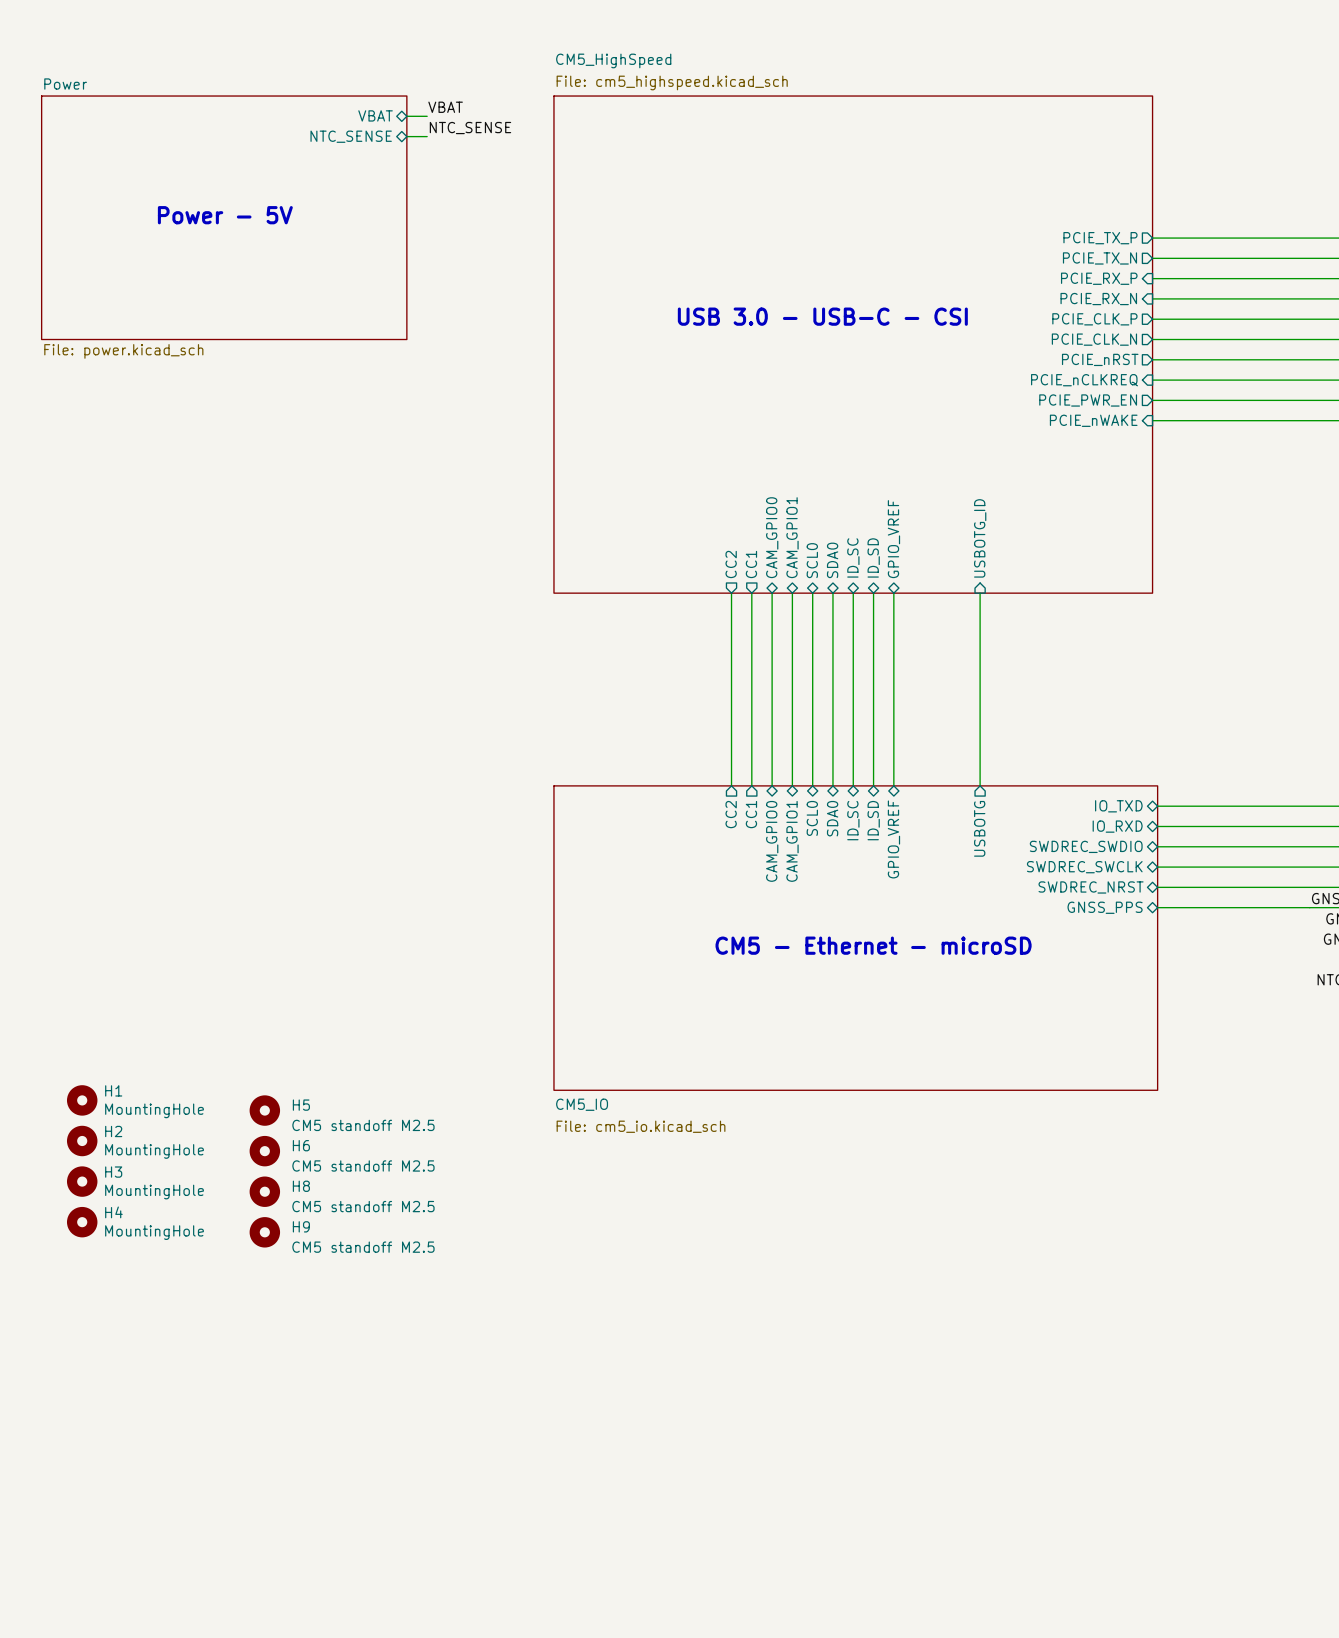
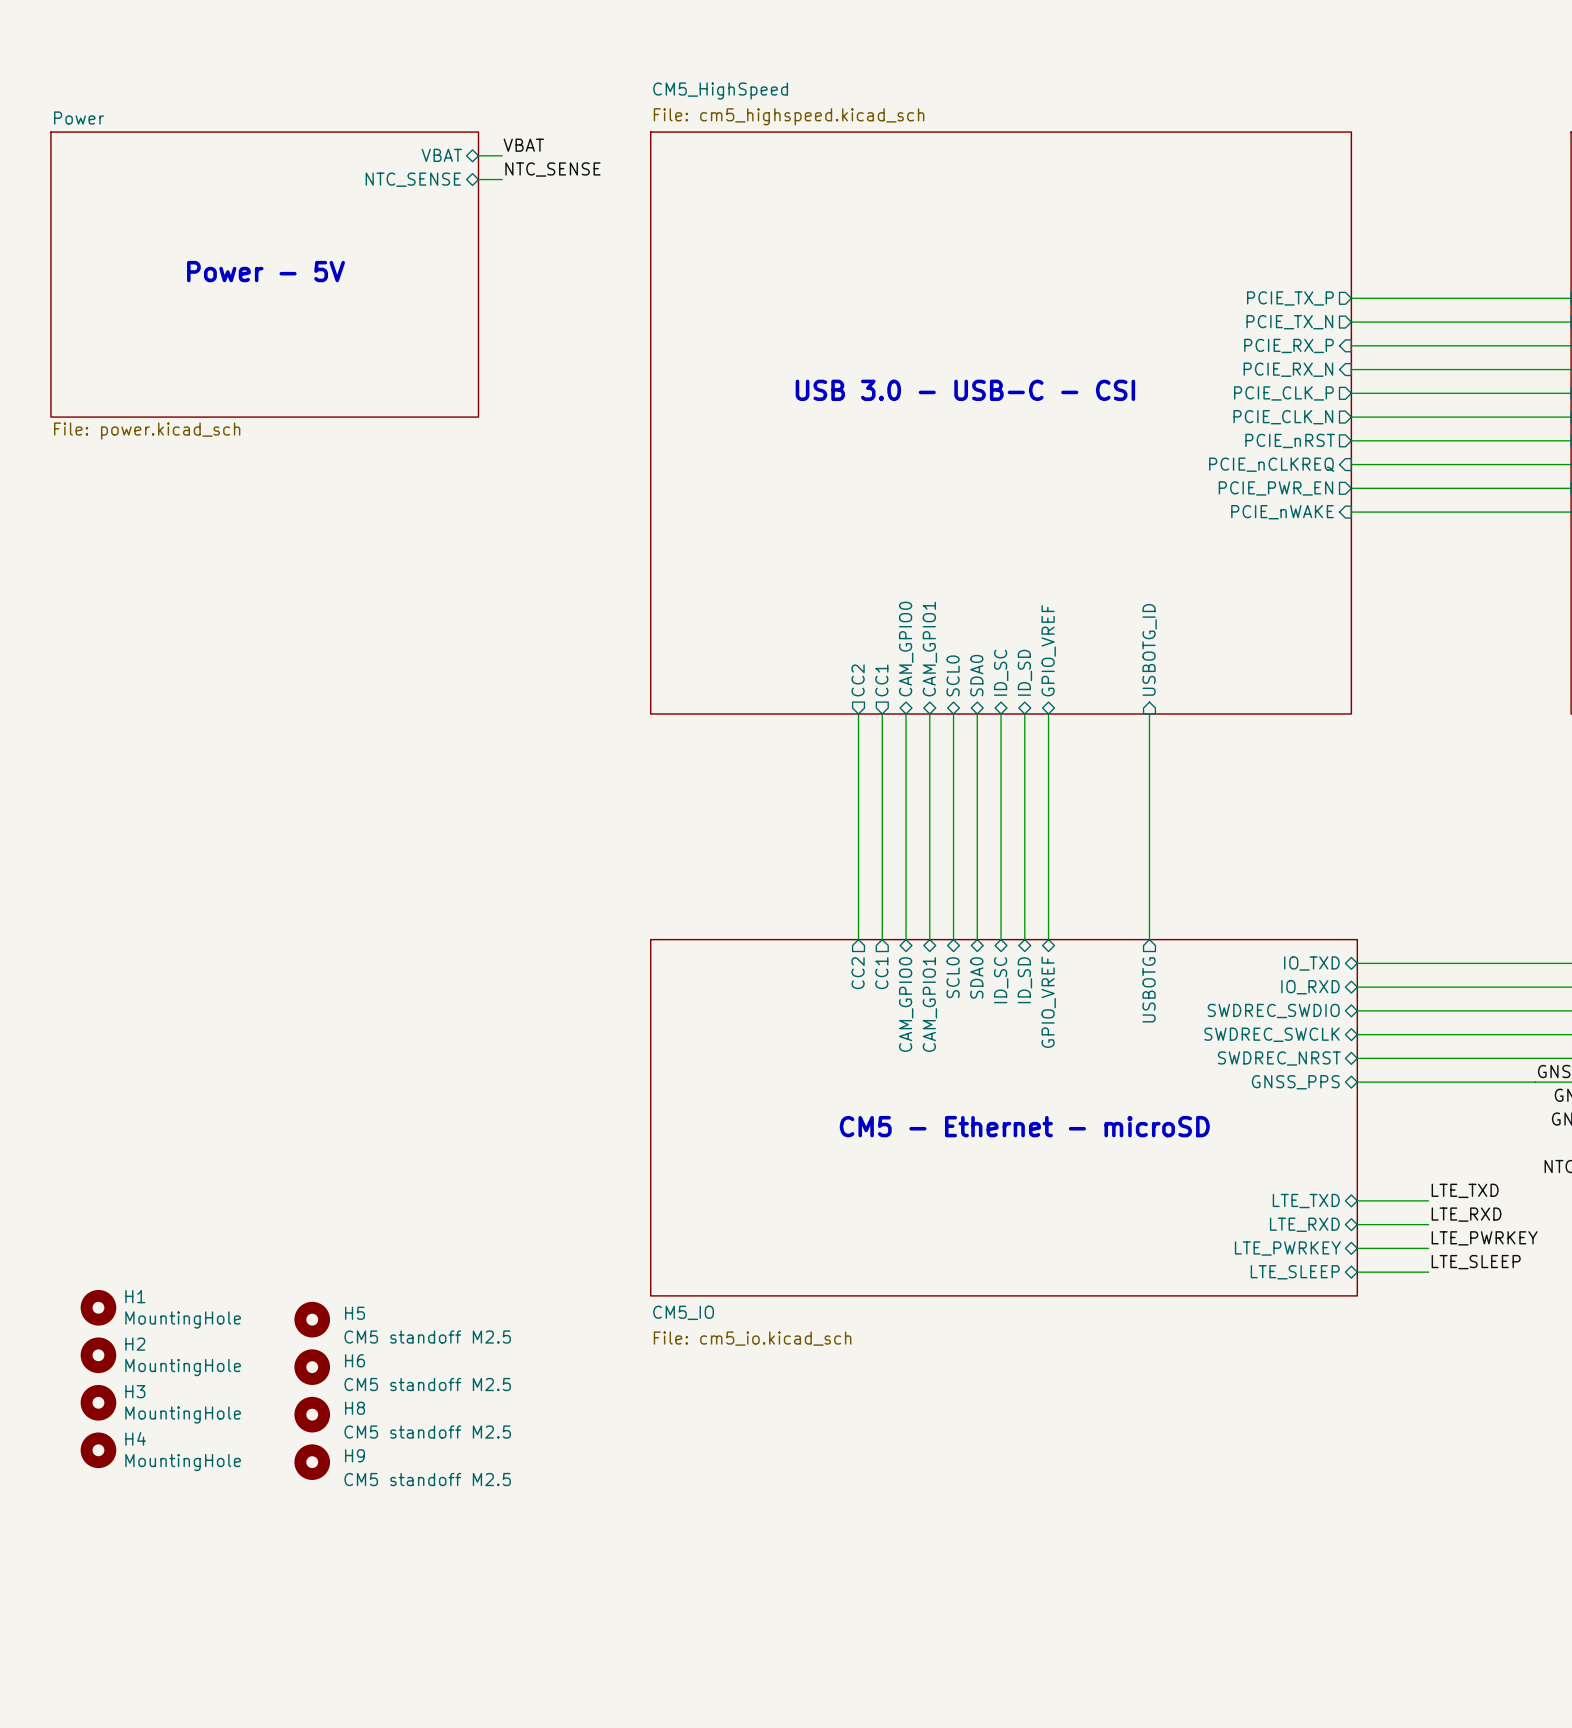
label: none -> LTE_TXD (1465, 1190)
sheet pin: none -> LTE_TXD (1306, 1201)
wire: none -> (1357, 1200) (1428, 1200)
label: none -> LTE_RXD (1466, 1214)
sheet pin: none -> LTE_RXD (1304, 1224)
wire: none -> (1357, 1224) (1428, 1224)
label: none -> LTE_PWRKEY (1484, 1238)
sheet pin: none -> LTE_PWRKEY (1287, 1248)
wire: none -> (1357, 1248) (1428, 1248)
label: none -> LTE_SLEEP (1476, 1262)
wire: none -> (1357, 1272) (1428, 1272)
sheet pin: none -> LTE_SLEEP (1295, 1272)

